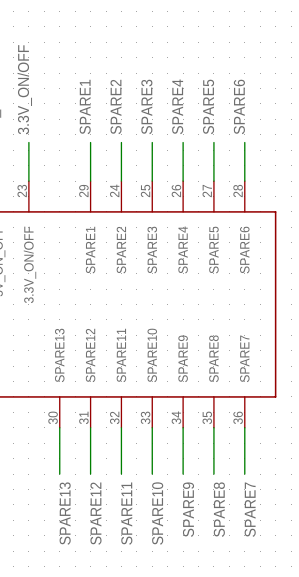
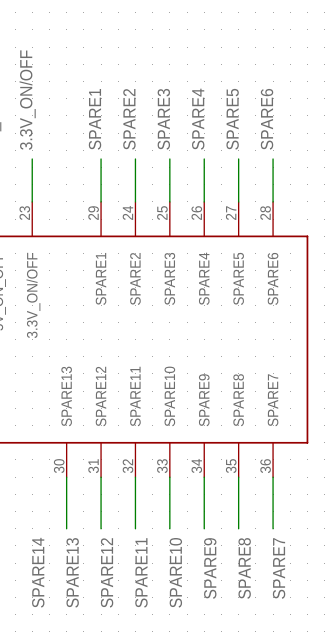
label: none -> SPARE14 (38, 572)

